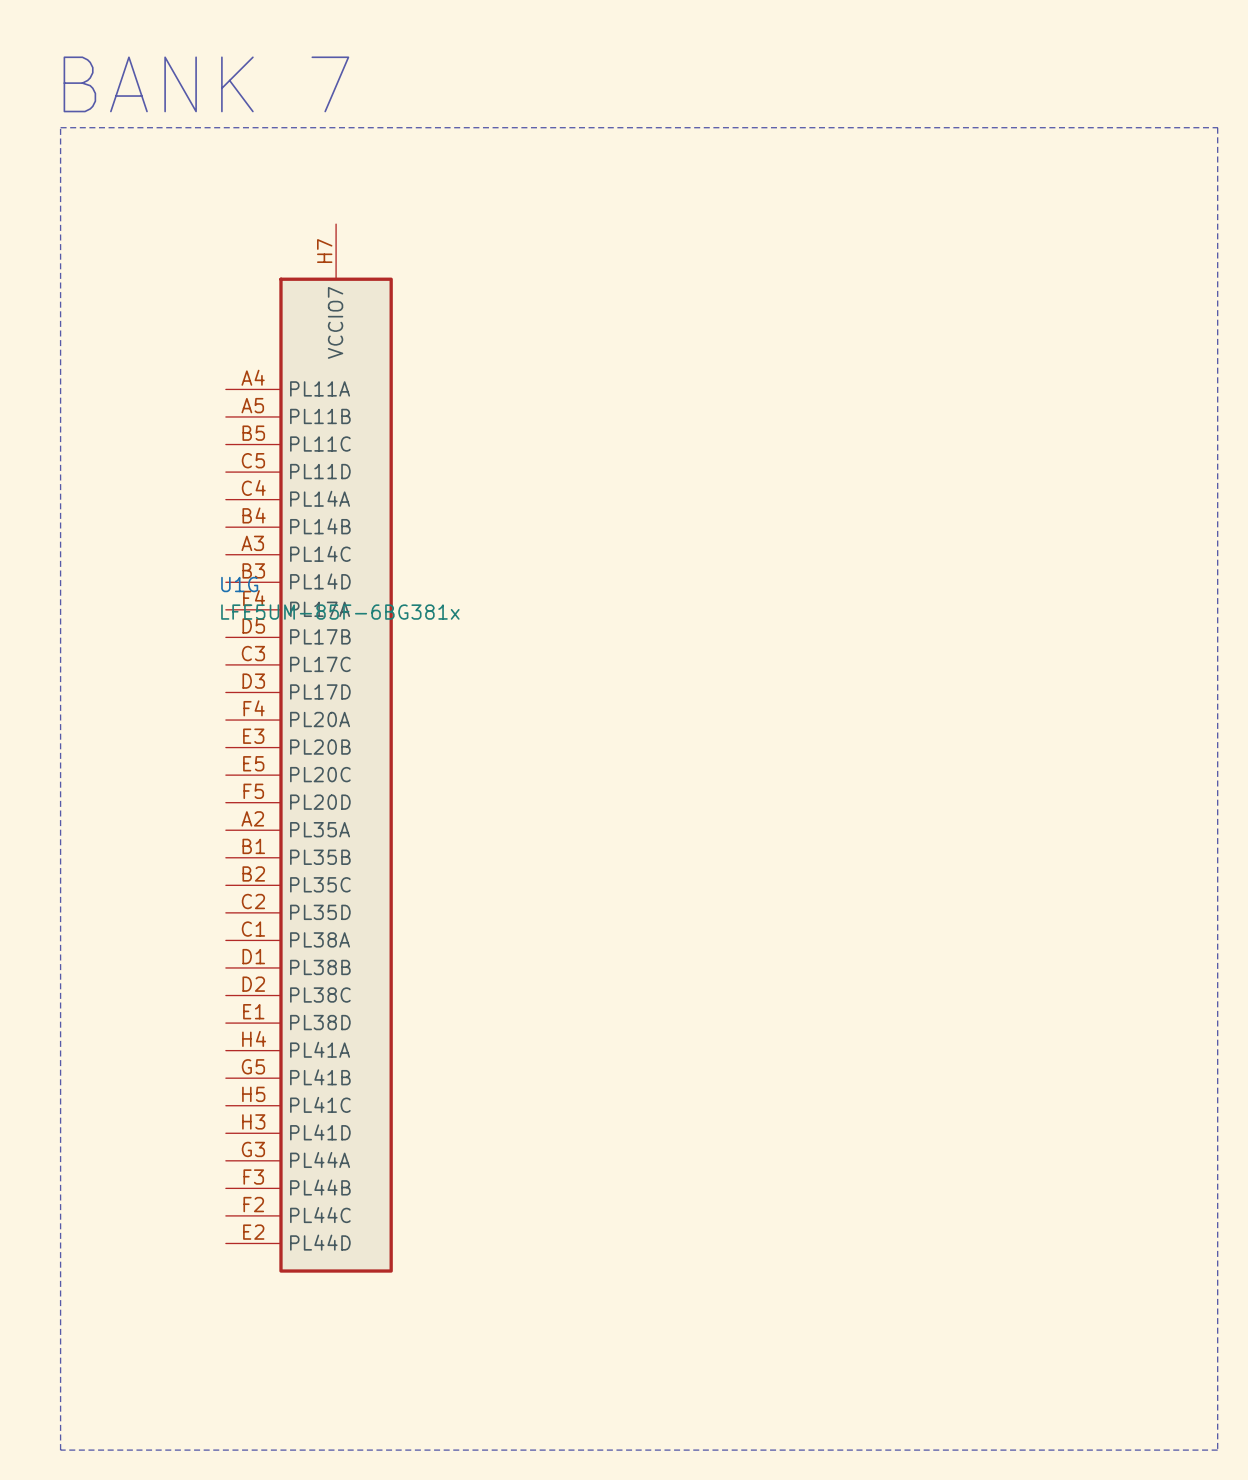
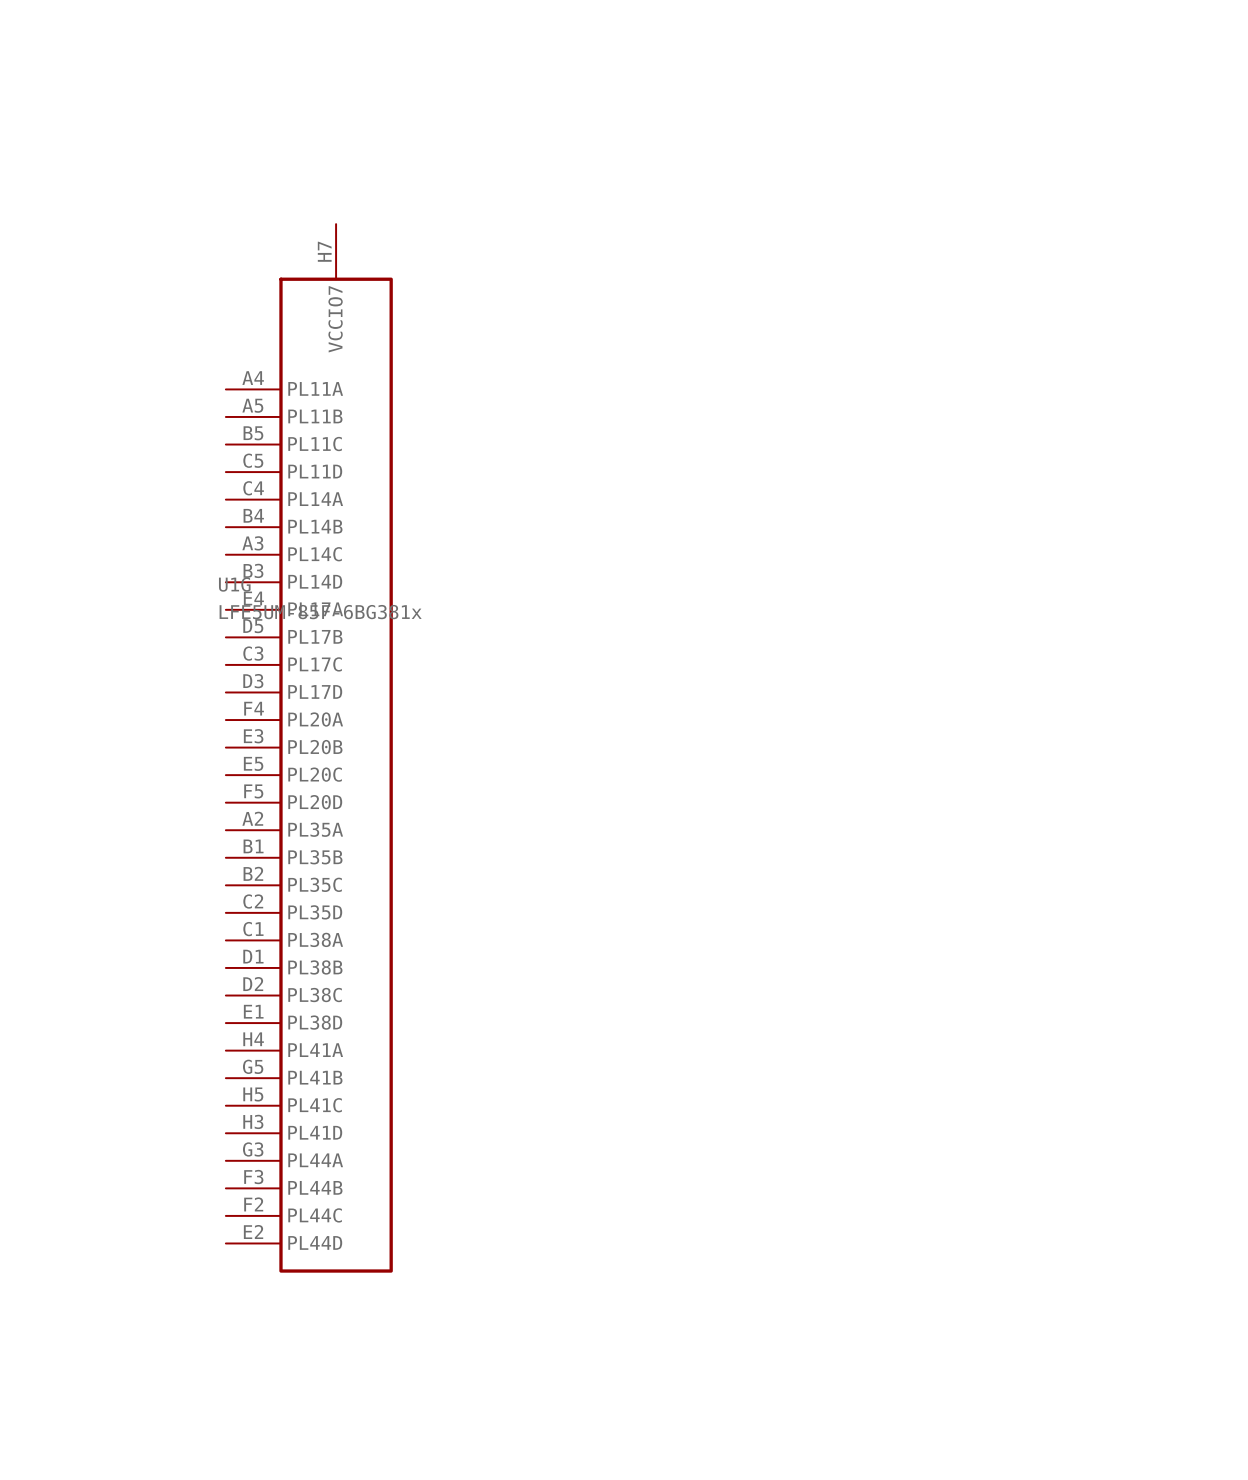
text: BANK 7 (206, 84) -> none
line: (60, 127) (1217, 127) (1217, 1450) (60, 1450) (60, 127) -> none

